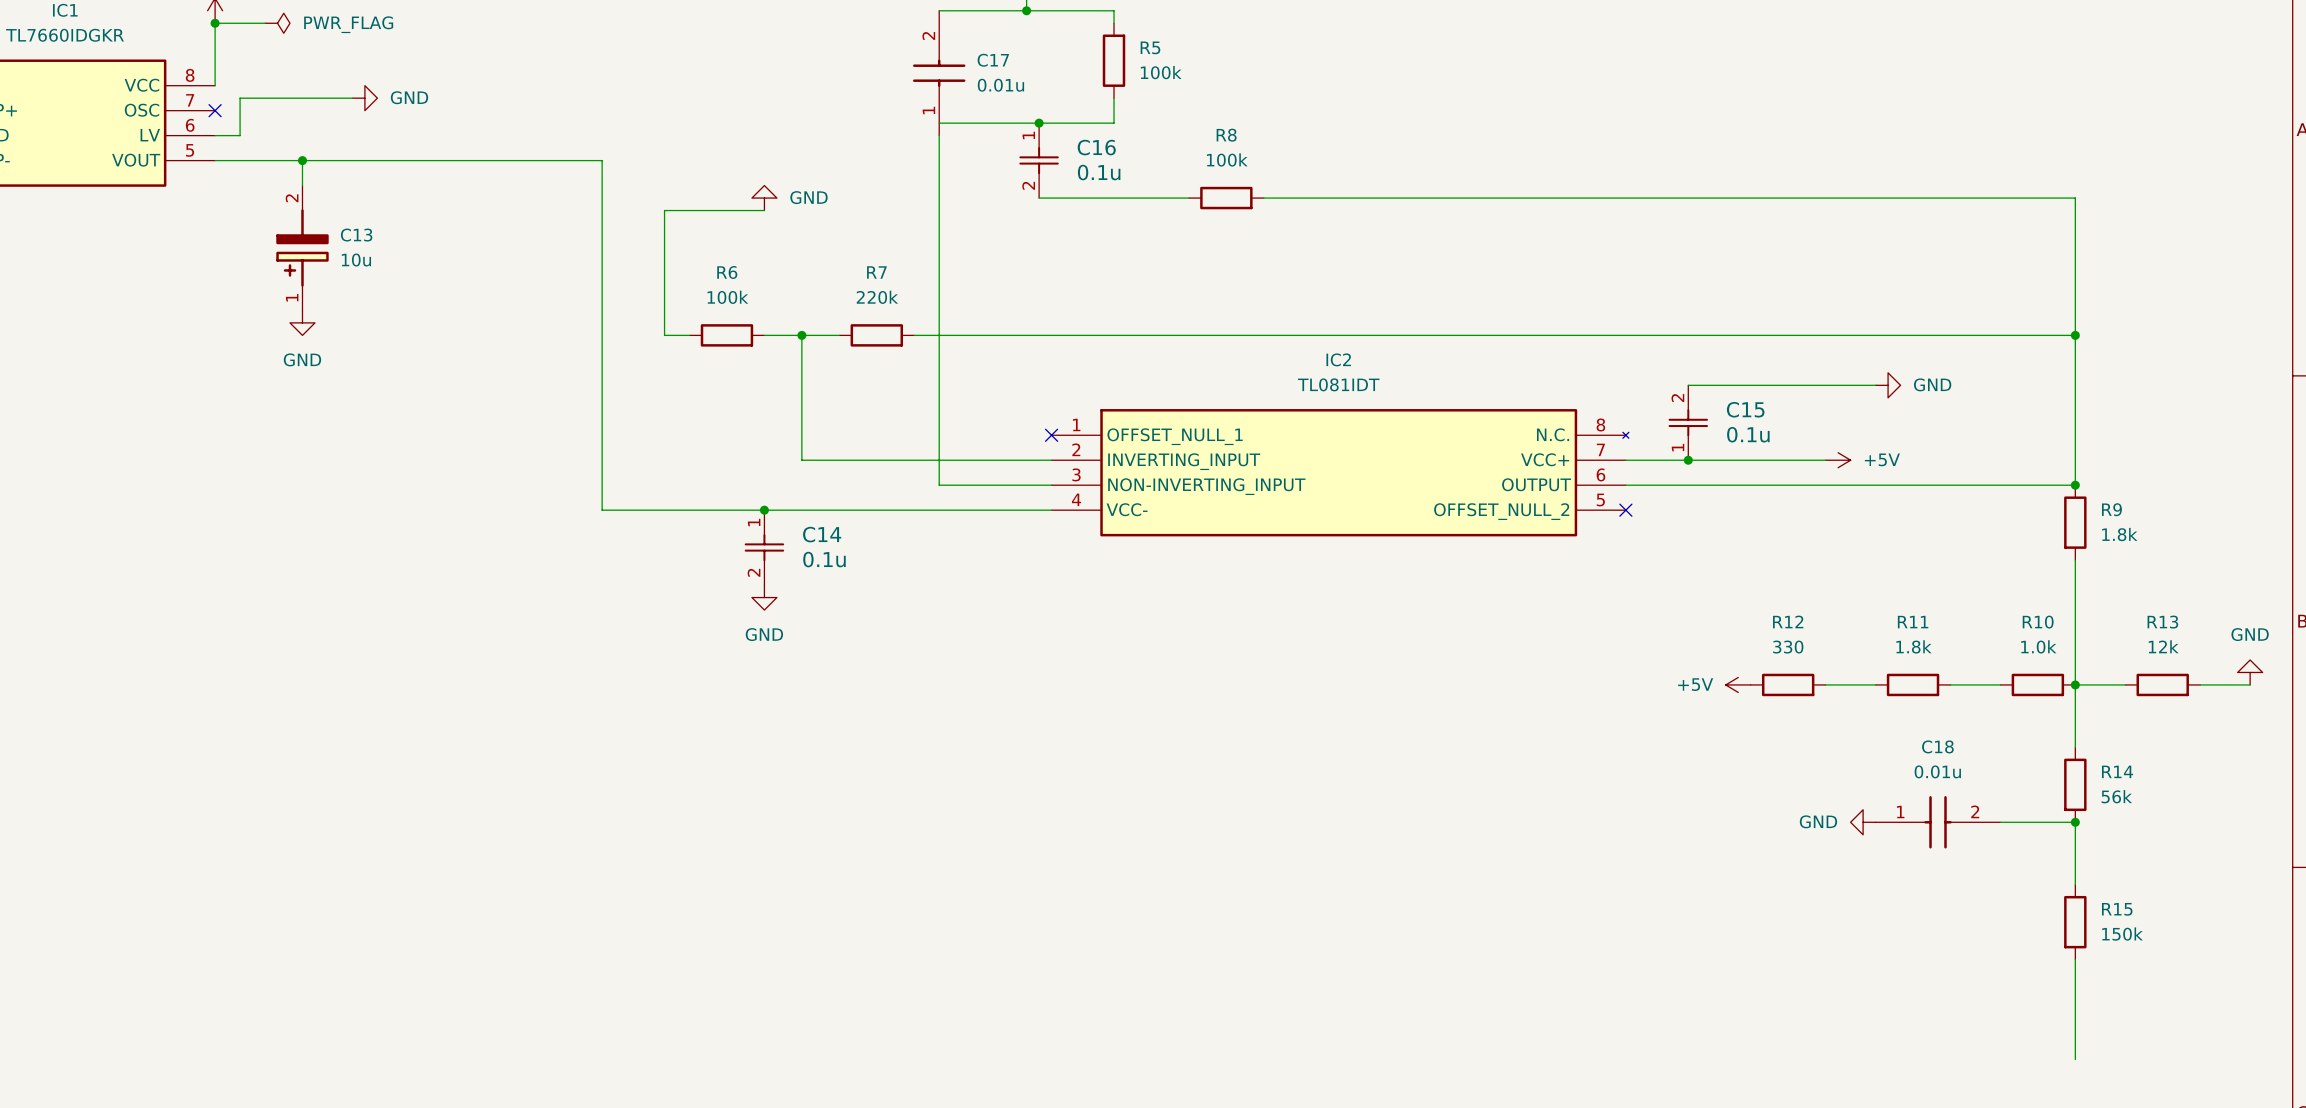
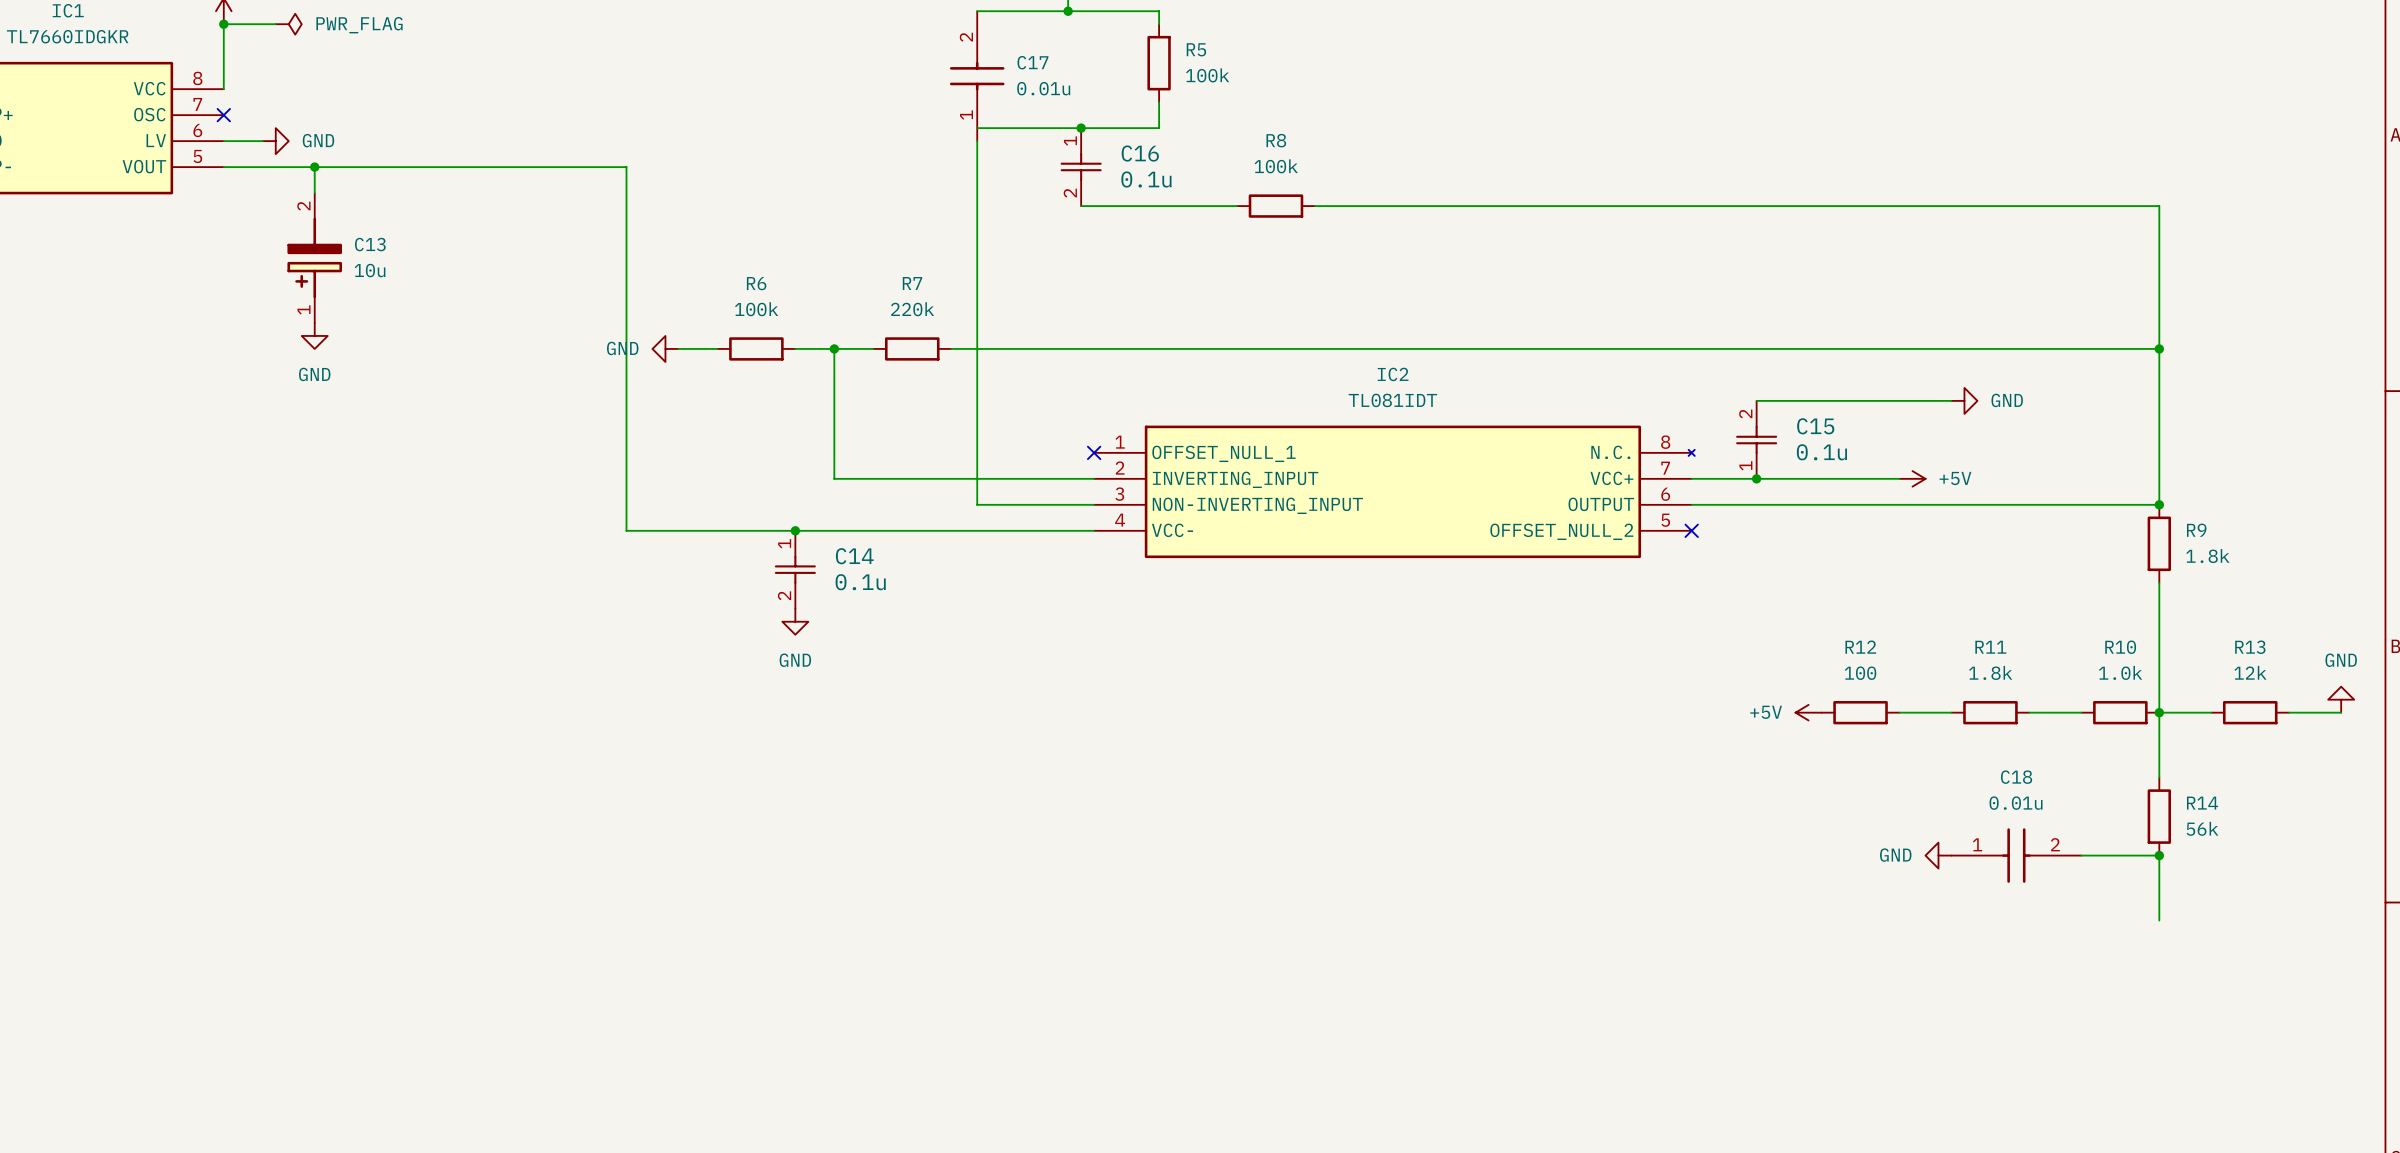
wire: (352, 98) (240, 98) (240, 135) -> (262, 141) (249, 141)
power symbol position: GND (364, 98) -> GND (275, 141)
power symbol: GND (764, 198) -> none
wire: (764, 210) (664, 210) (664, 335) -> (678, 348) (691, 348)
power symbol: none -> GND (665, 348)
R12 value: 330 (1788, 647) -> 100 (1860, 673)
R15: 150k (2075, 922) -> none
wire: (2075, 959) (2075, 1059) -> none

